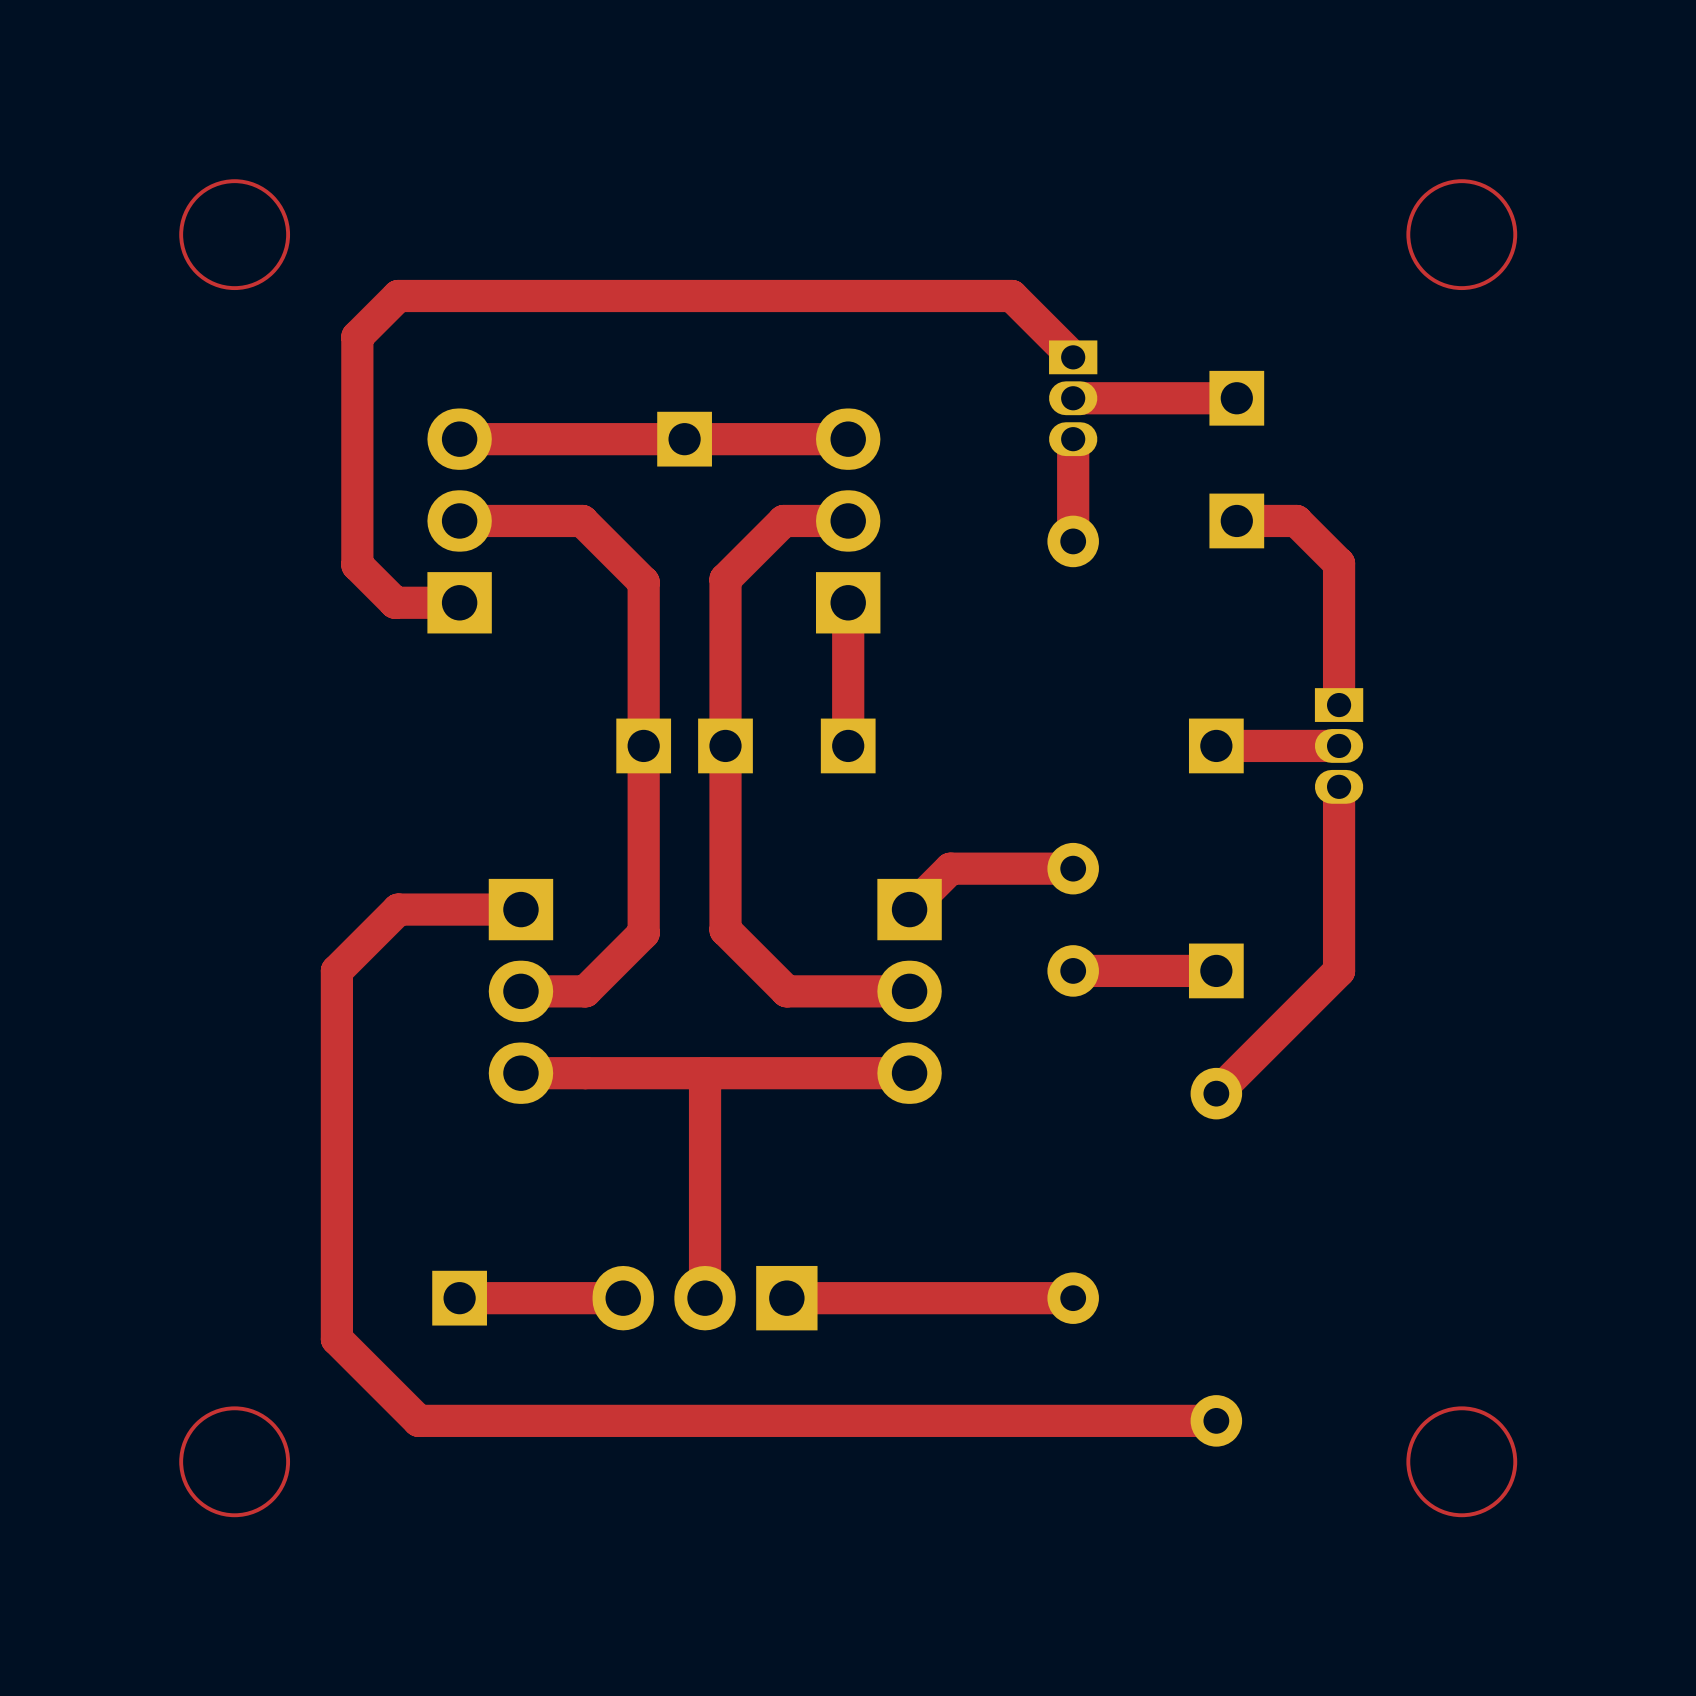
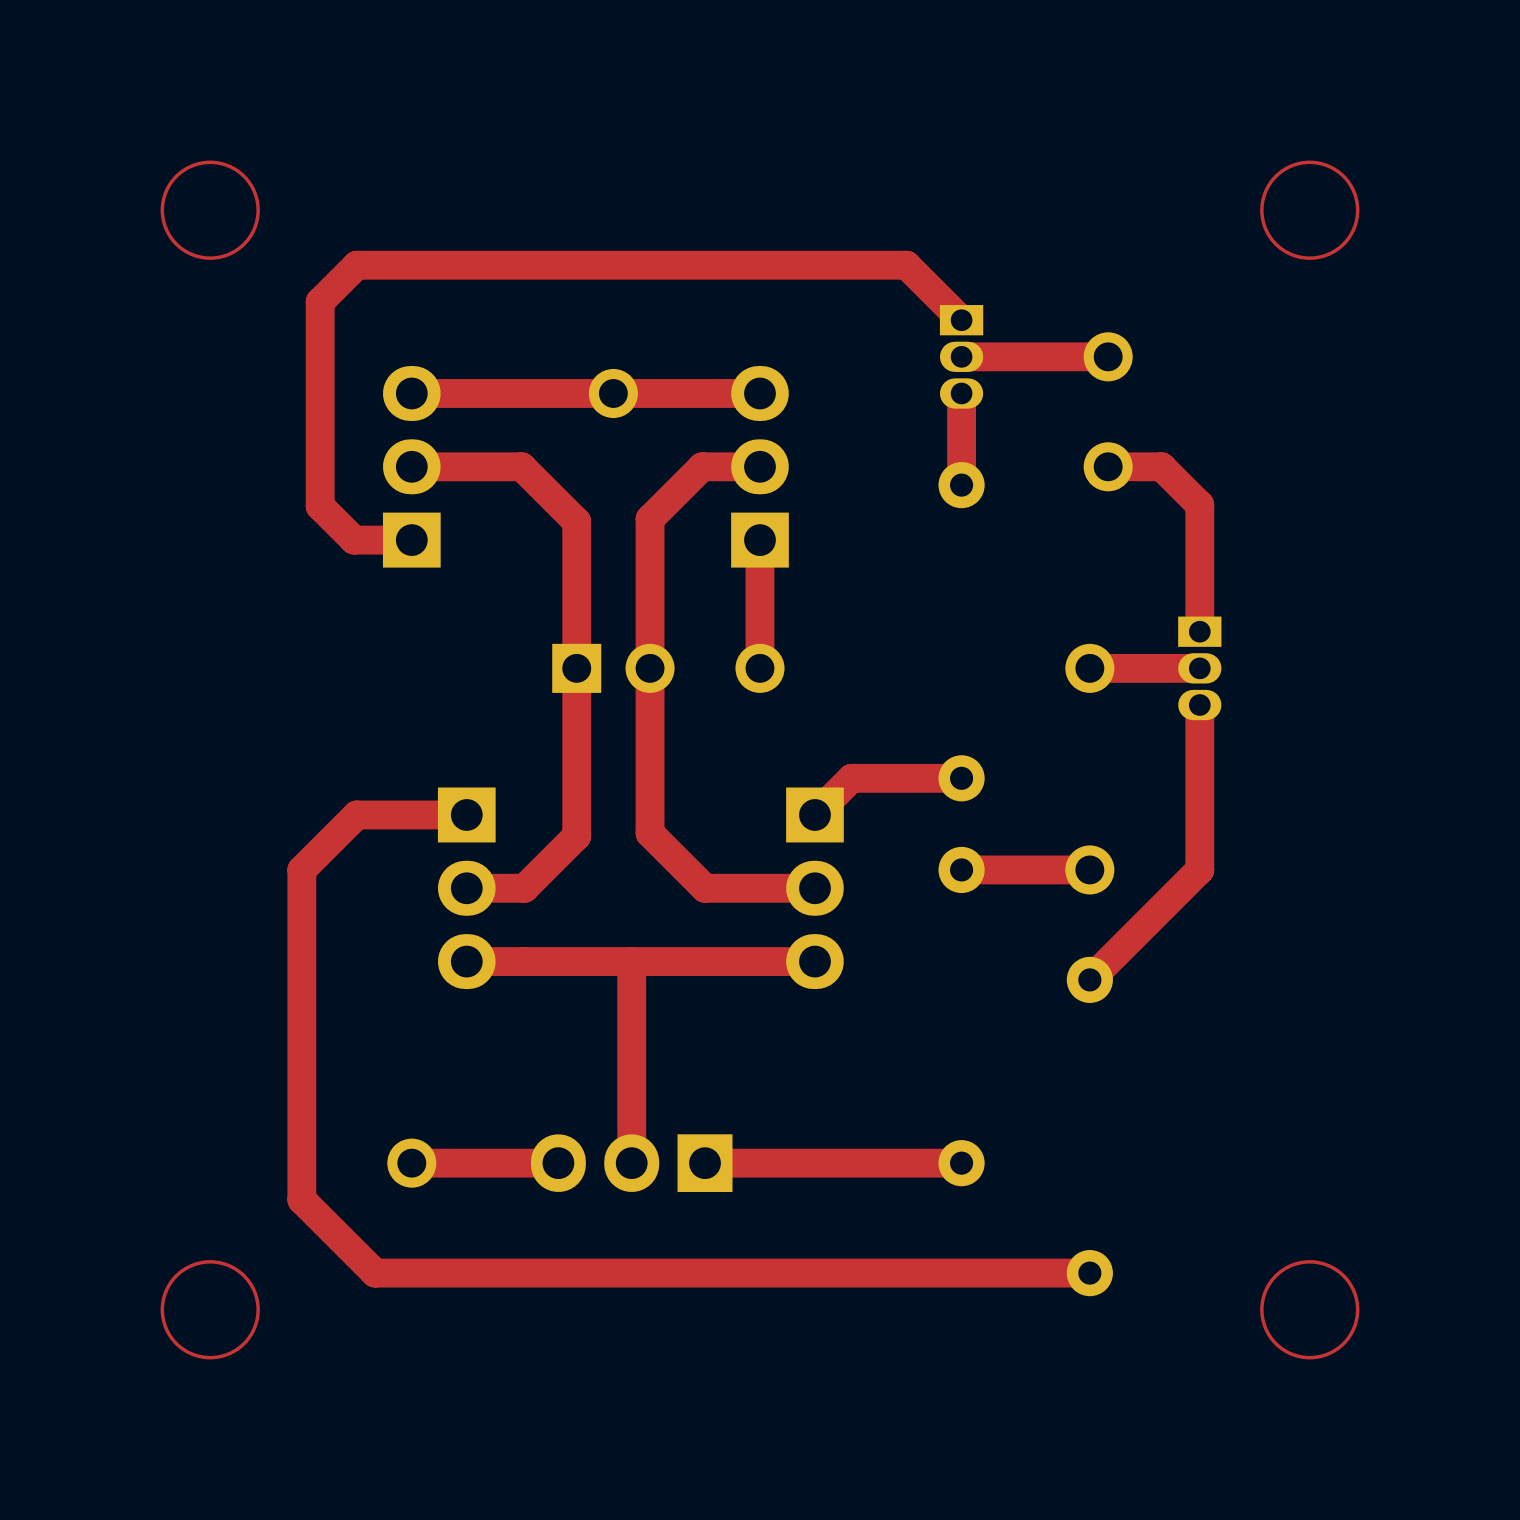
part footprint: [1209, 370, 1265, 426] -> [1083, 332, 1133, 382]
part footprint: [657, 411, 712, 467] -> [588, 368, 638, 419]
part footprint: [1209, 493, 1265, 549] -> [1083, 442, 1133, 492]
part footprint: [820, 718, 876, 774] -> [735, 643, 785, 693]
part footprint: [1188, 718, 1244, 774] -> [1065, 643, 1115, 693]
part: none -> (613, 668)
part: (725, 745) -> none
part footprint: [1188, 943, 1244, 999] -> [1065, 845, 1115, 895]
part footprint: [432, 1270, 487, 1326] -> [387, 1138, 437, 1188]

